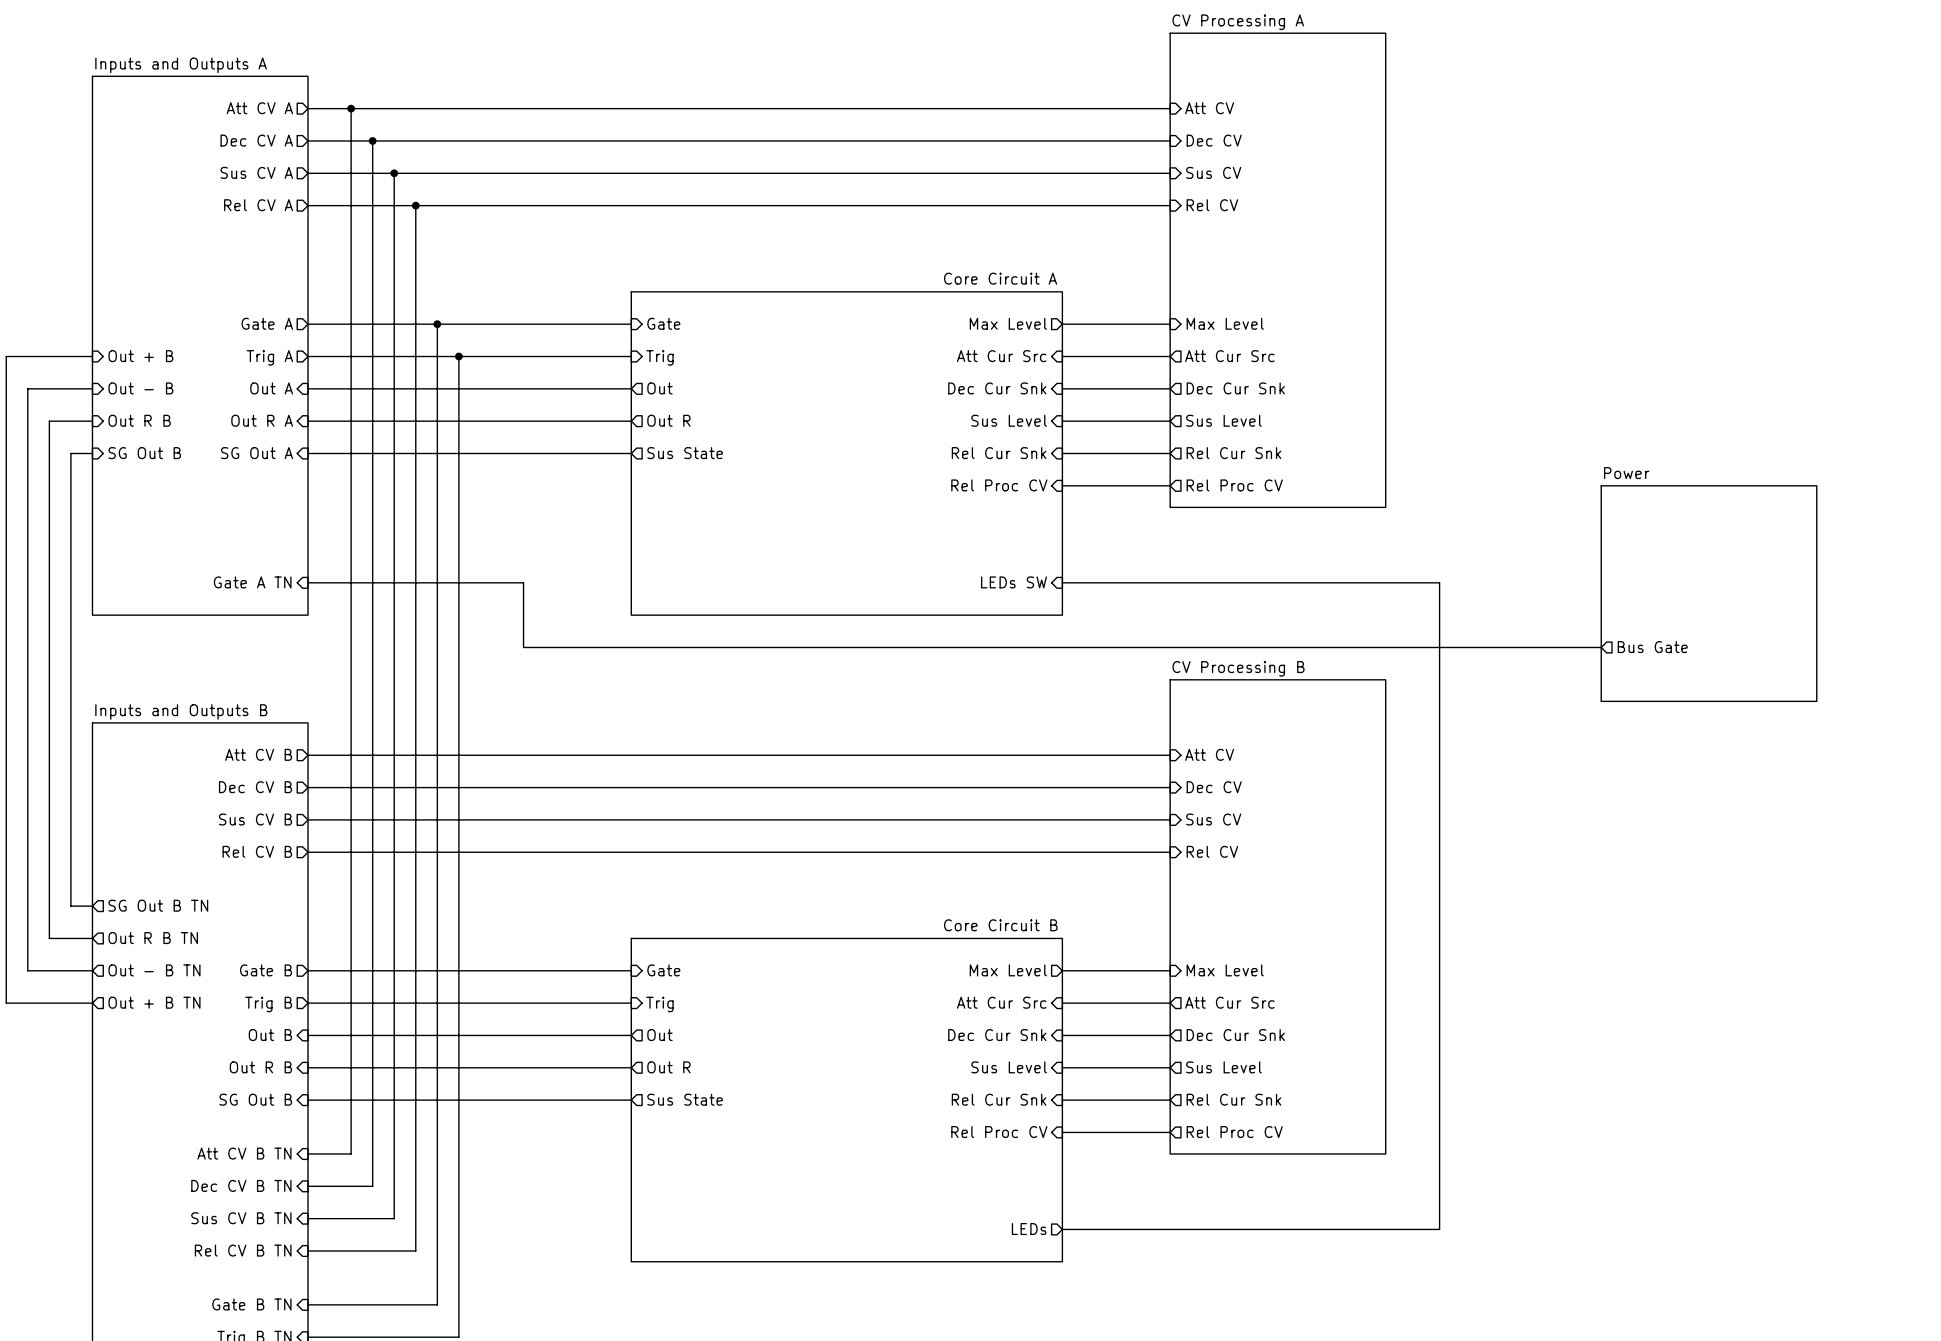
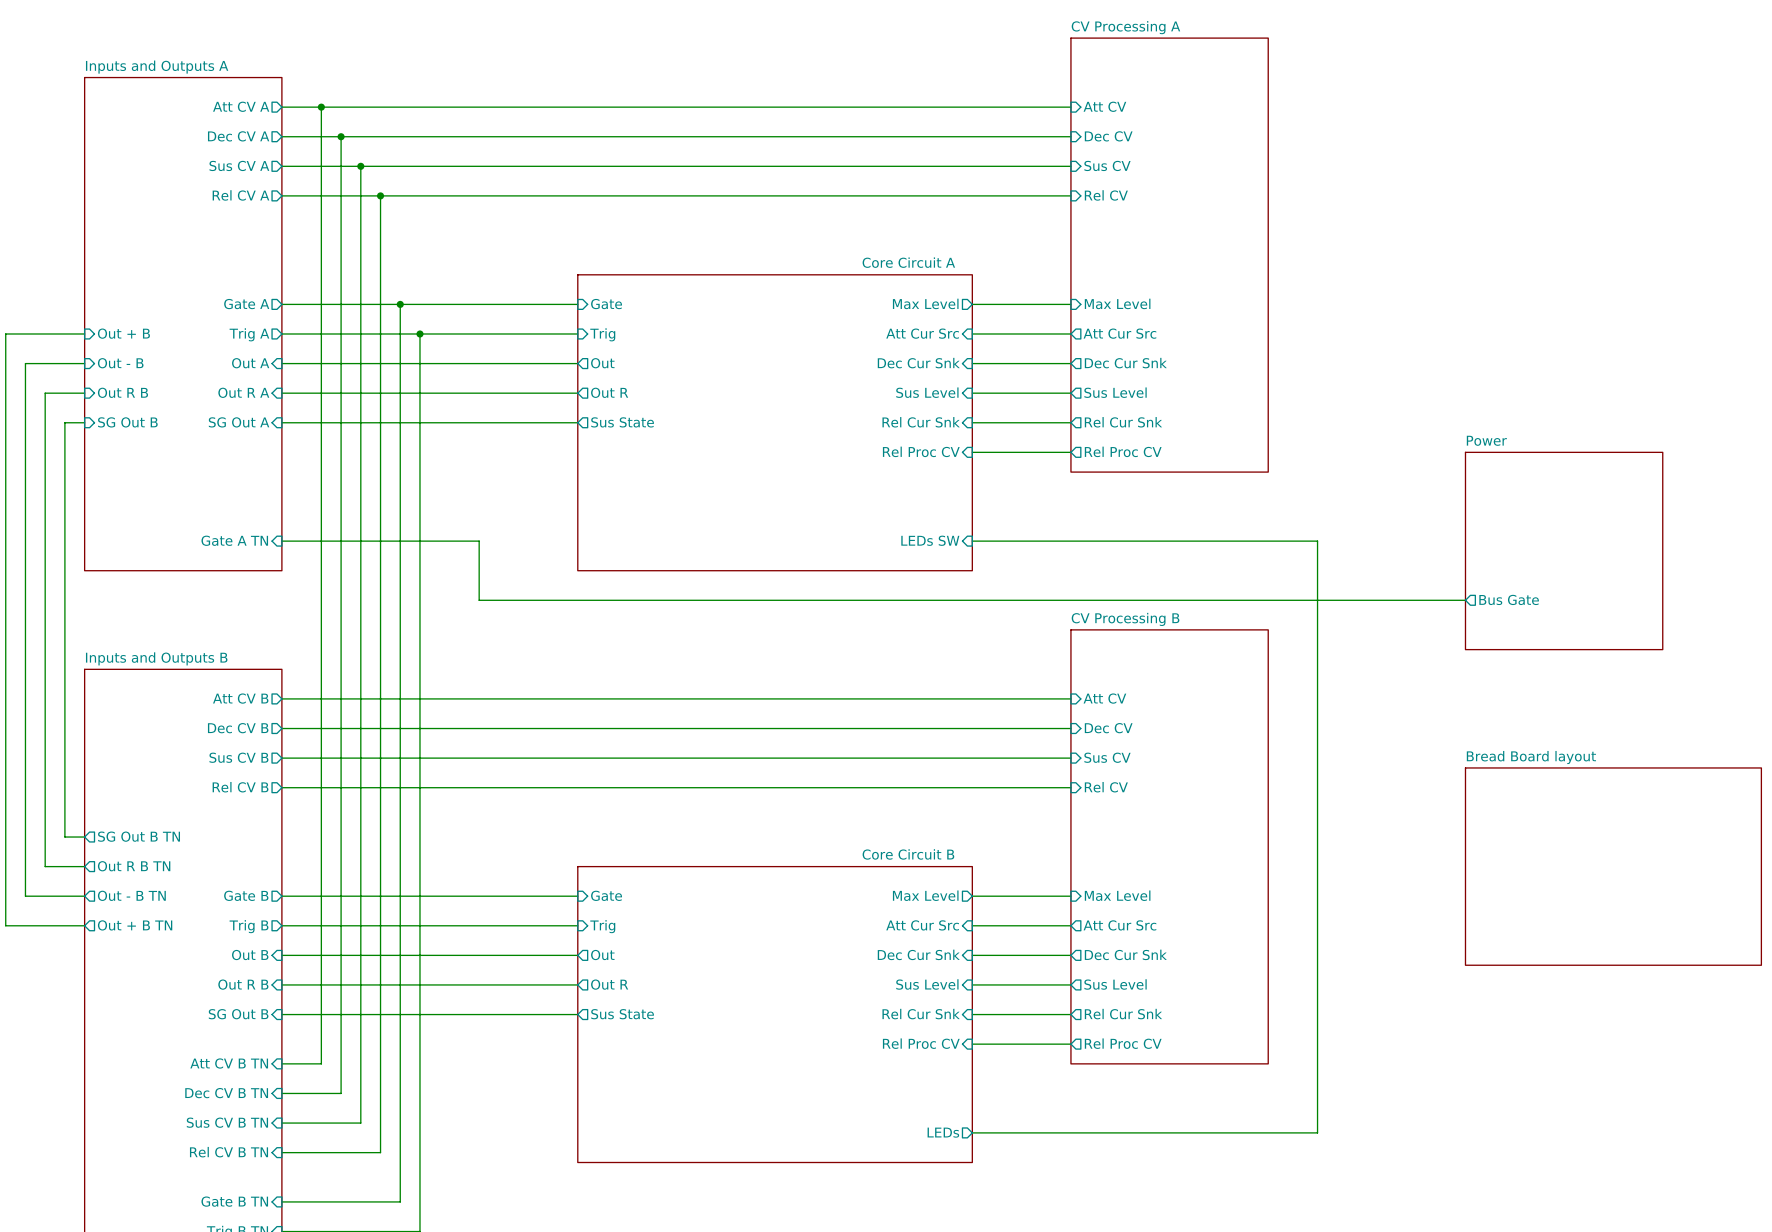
sheet Bread Board layout: none -> (1613, 866)

